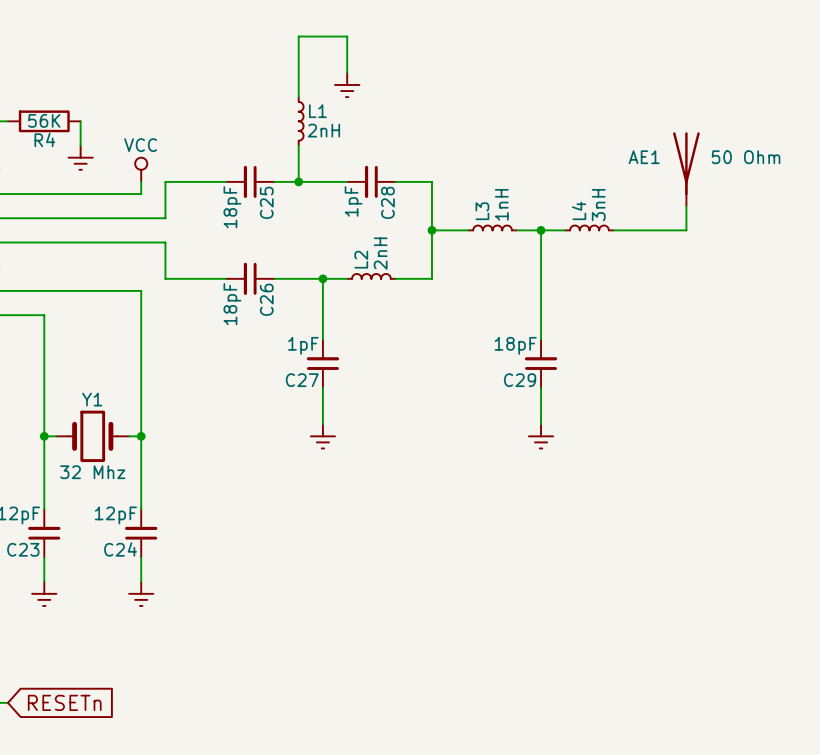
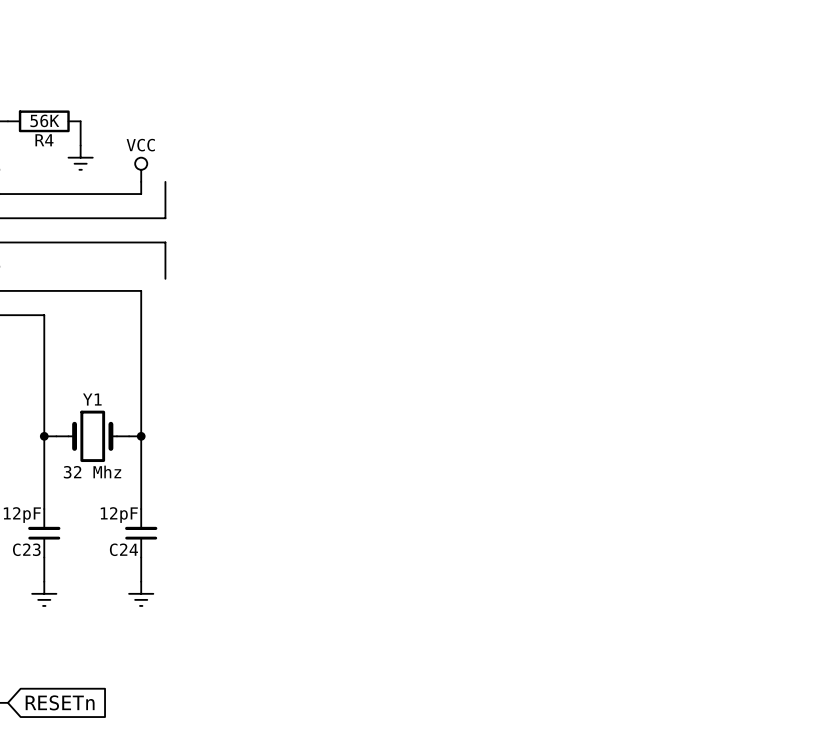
wire: (347, 72) (347, 36) (298, 36) (298, 97) -> none
power symbol: (347, 84) -> none
L1: 2nH (301, 121) -> none
wire: (298, 145) (298, 181) -> none
AE1: 50 Ohm (686, 169) -> none
wire: (165, 181) (226, 181) -> none
C25: 18pF (250, 181) -> none
wire: (274, 181) (347, 181) -> none
junction: (298, 181) -> none
C28: 1pF (371, 181) -> none
wire: (395, 181) (431, 181) (431, 278) (395, 278) -> none
wire: (686, 206) (686, 230) (613, 230) -> none
L3: 1nH (492, 227) -> none
L4: 3nH (589, 227) -> none
wire: (431, 230) (468, 230) -> none
junction: (431, 230) -> none
wire: (516, 230) (565, 230) -> none
wire: (541, 230) (541, 339) -> none
junction: (541, 230) -> none
L2: 2nH (371, 276) -> none
wire: (165, 278) (226, 278) -> none
C26: 18pF (250, 278) -> none
wire: (274, 278) (347, 278) -> none
wire: (322, 278) (322, 339) -> none
junction: (322, 278) -> none
C27: 1pF (322, 363) -> none
C29: 18pF (541, 363) -> none
wire: (322, 387) (322, 424) -> none
wire: (541, 387) (541, 424) -> none
power symbol: (322, 436) -> none
power symbol: (541, 436) -> none

